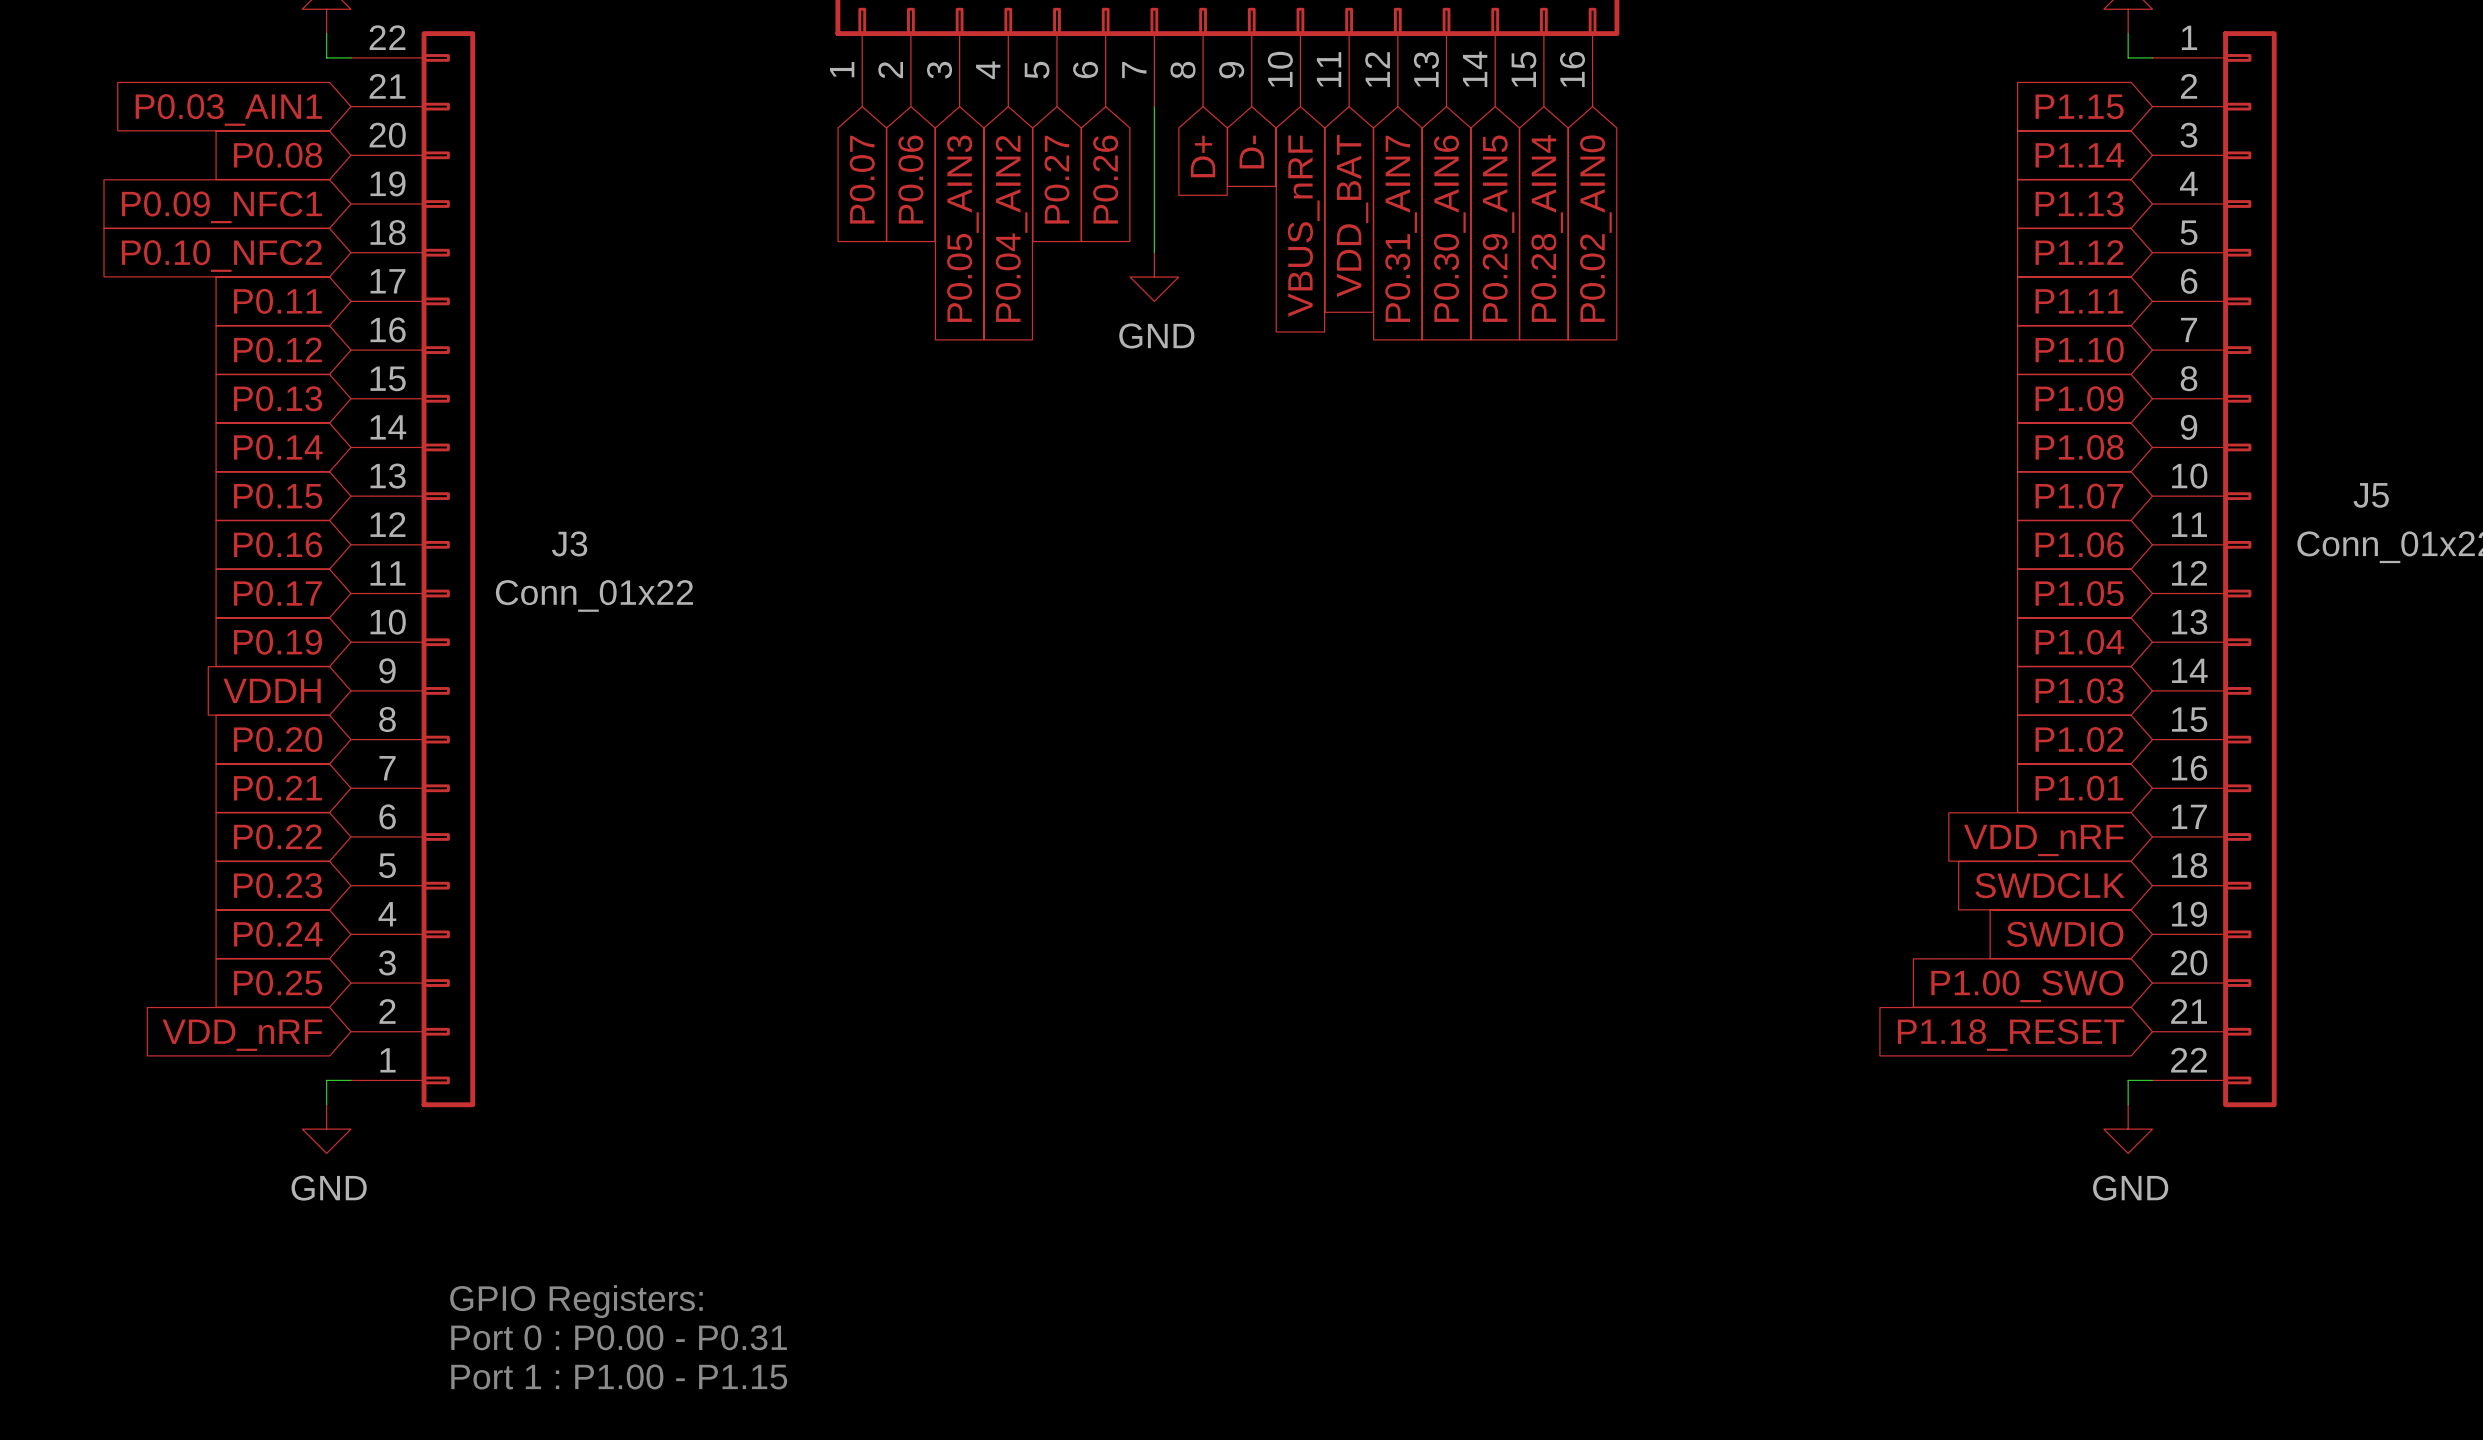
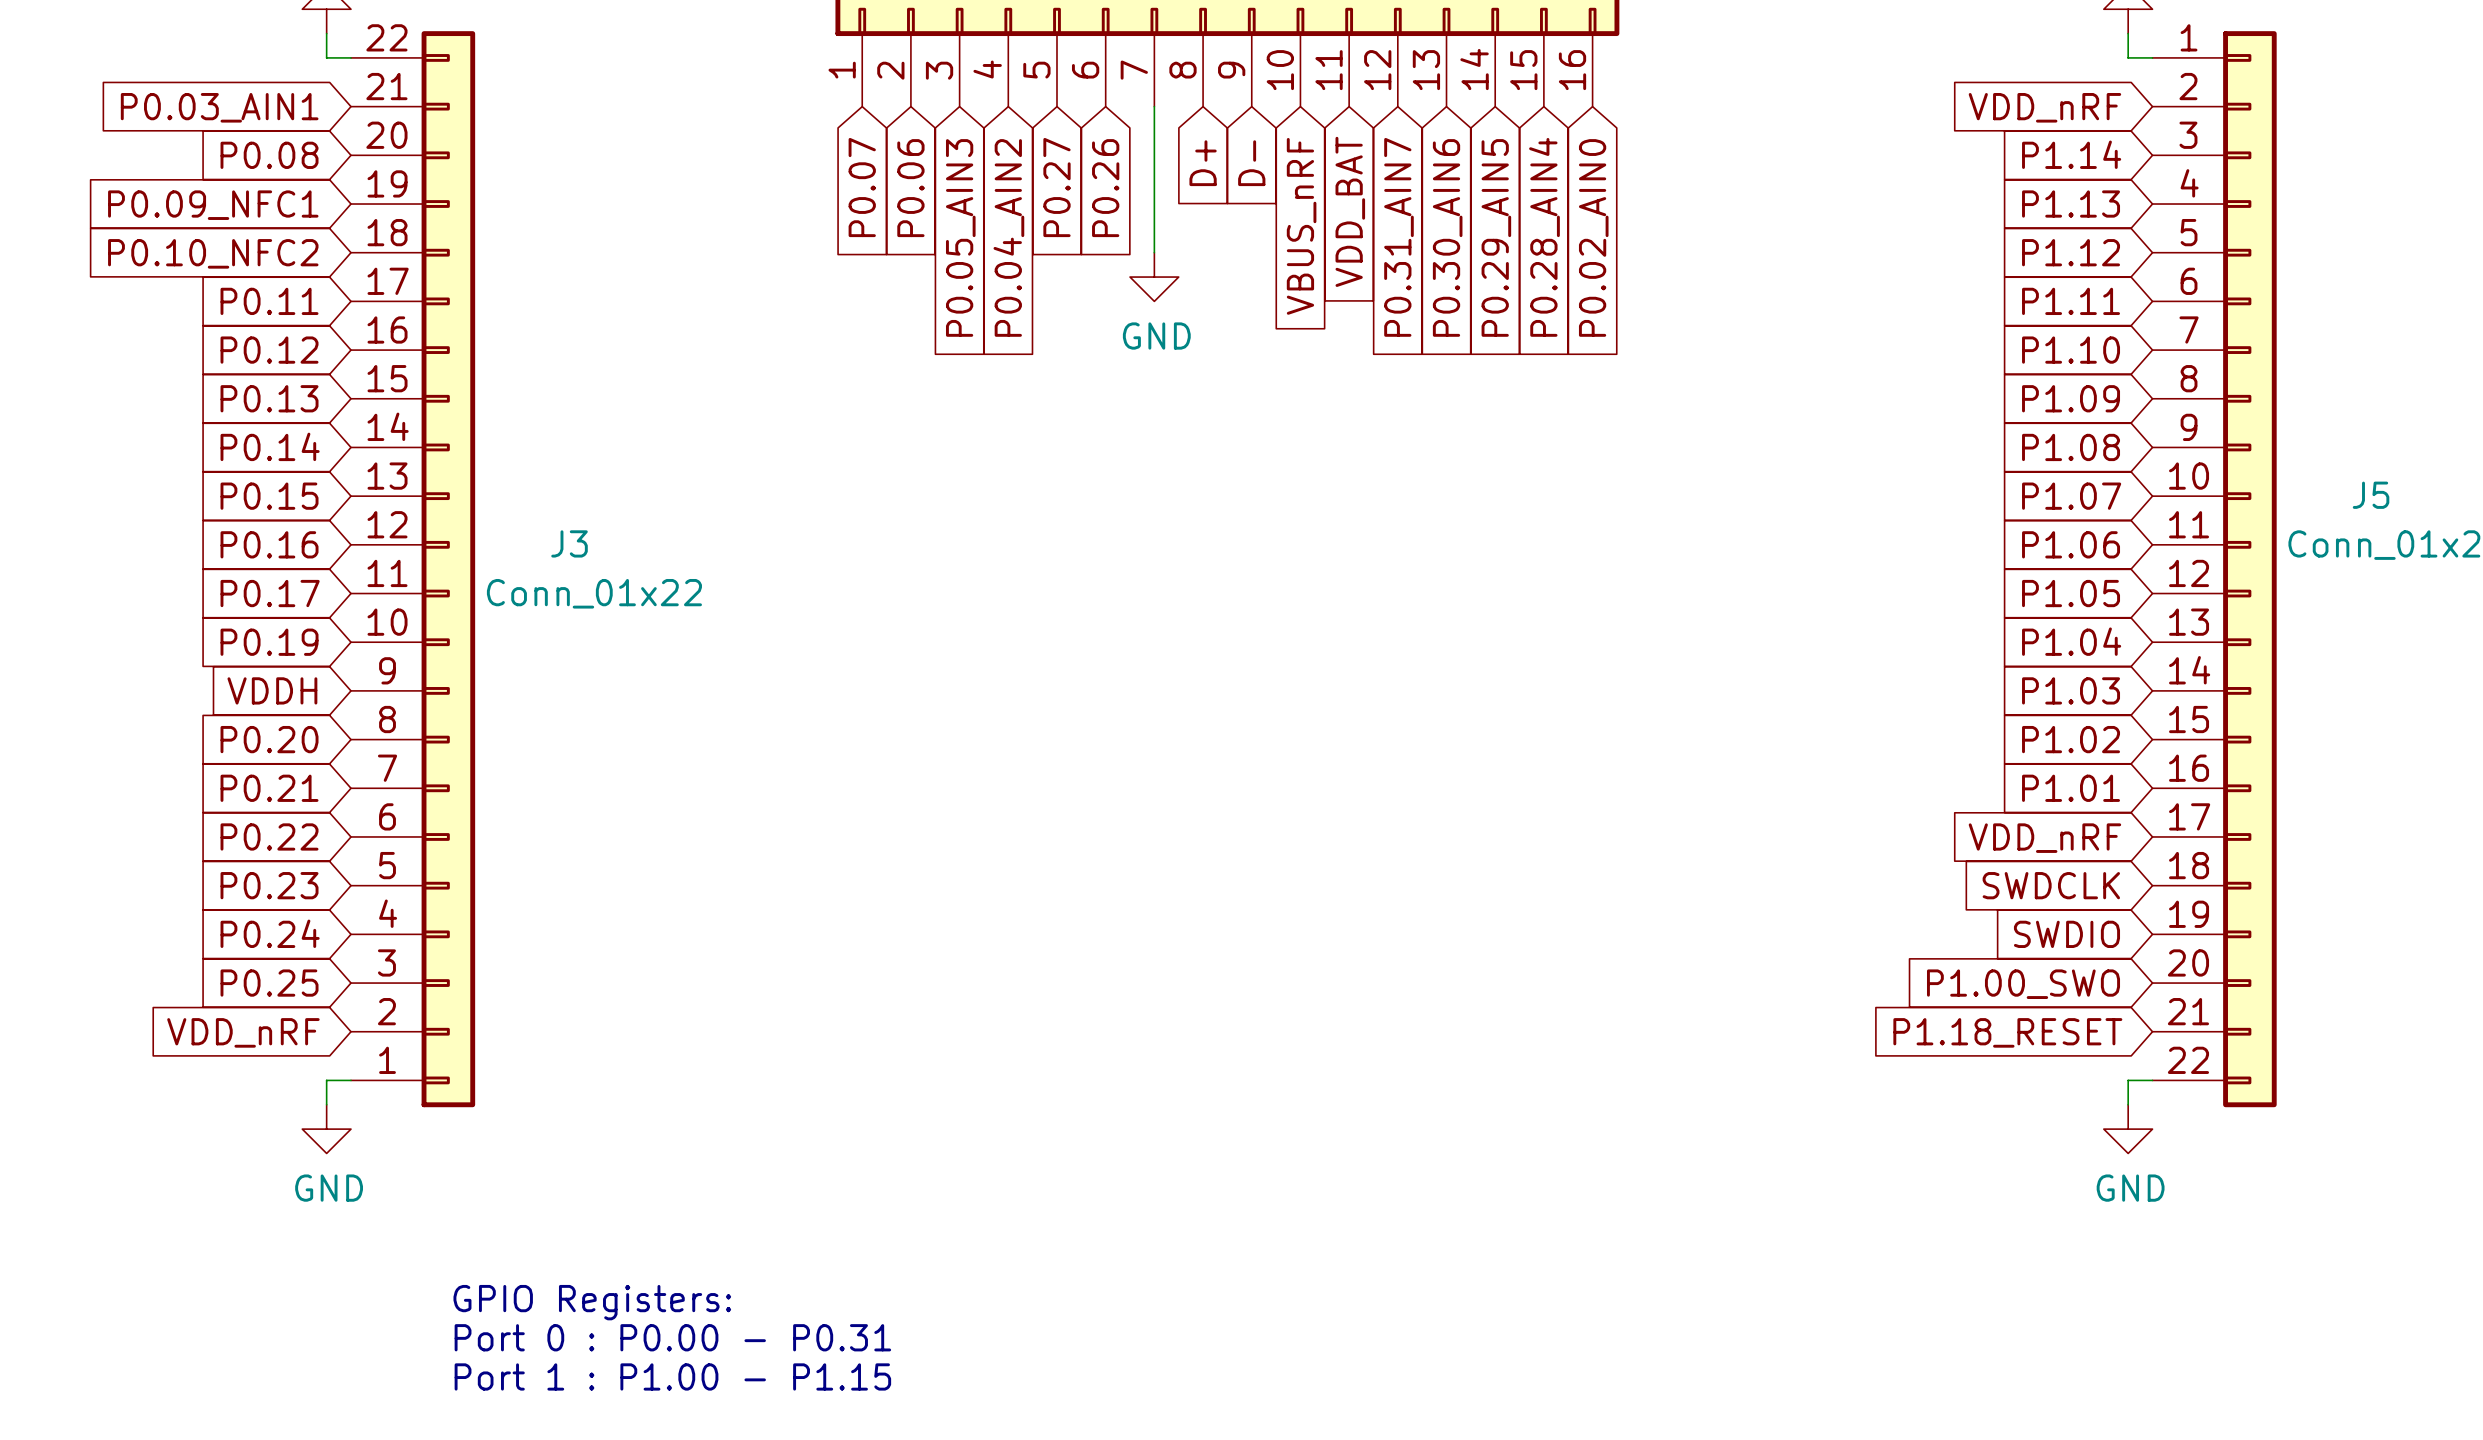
global label: P1.15 (2079, 106) -> VDD_nRF (2044, 107)

